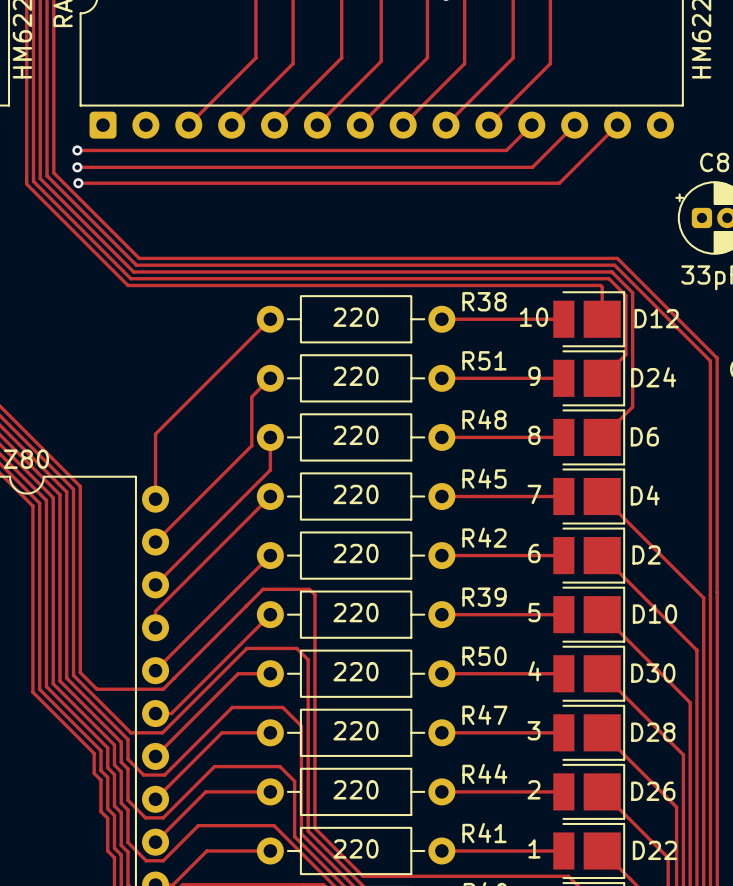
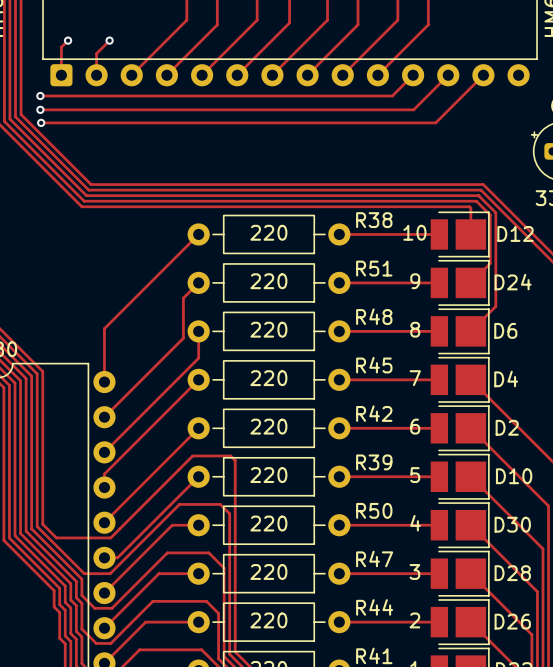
track: none -> (68, 40) (61, 47) (61, 75)
via: none -> (68, 40)
track: none -> (109, 40) (96, 53) (96, 75)
via: none -> (109, 40)

